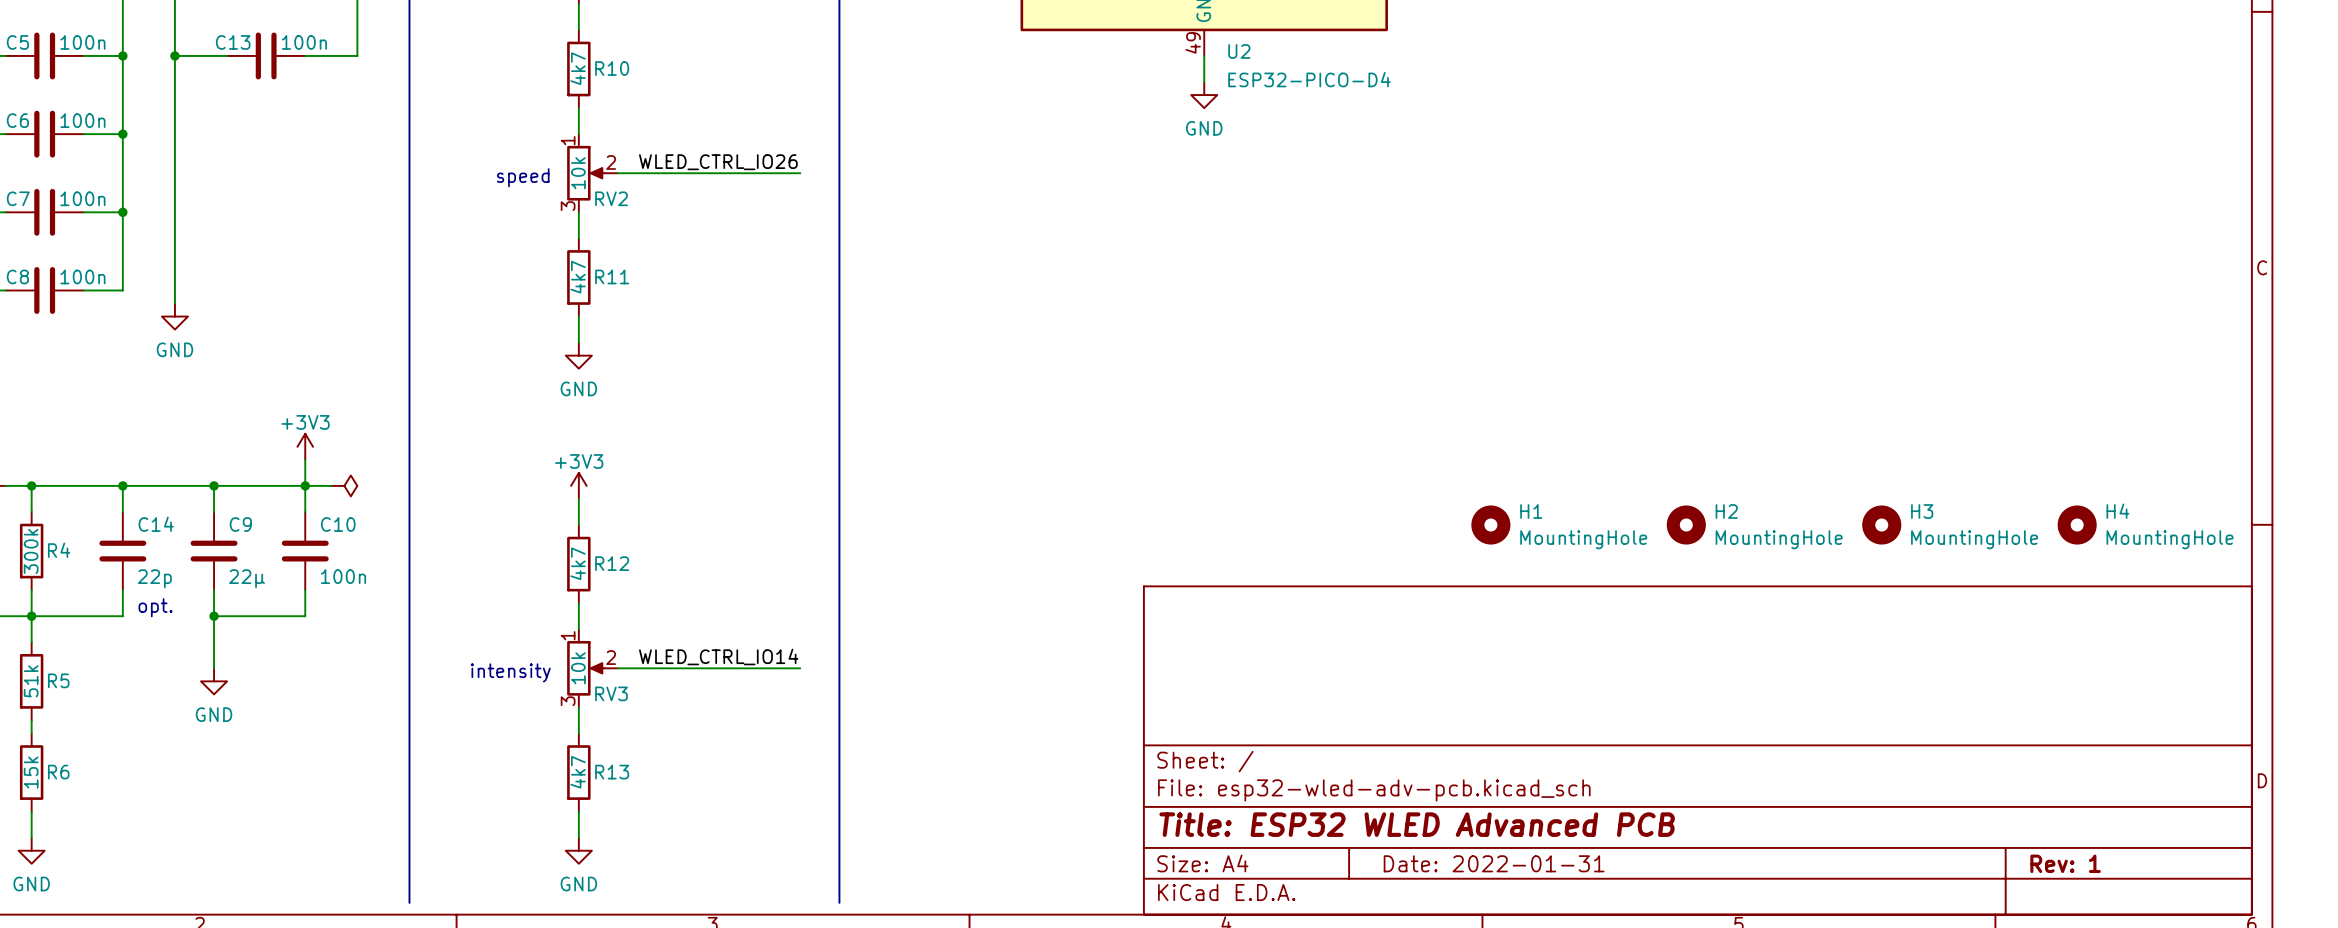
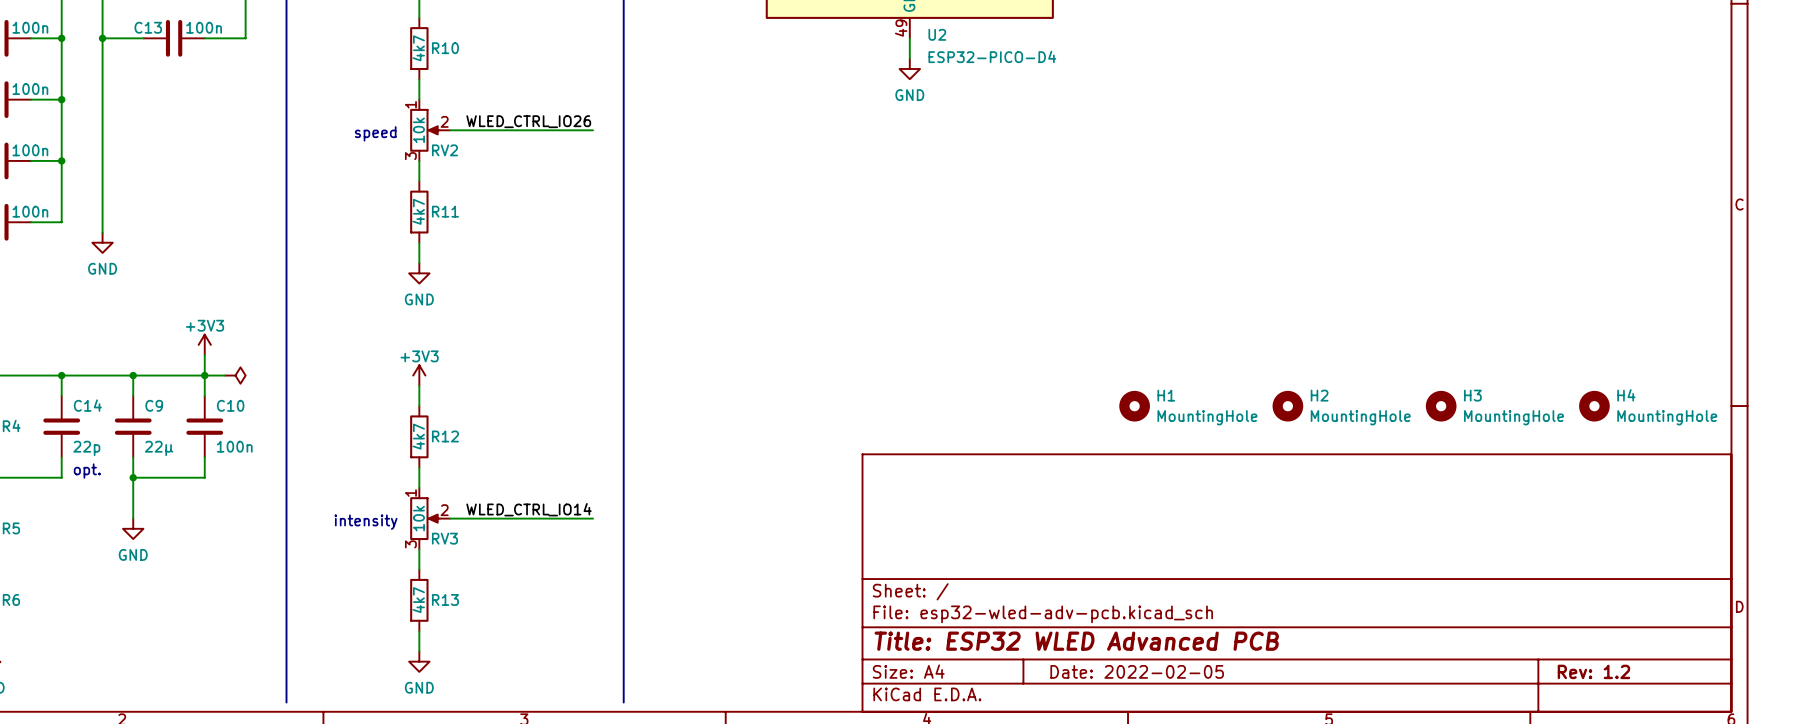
title block: Date: 2022-01-31 (1494, 863) -> Date: 2022-02-05 (1137, 671)
title block: Rev: 1 (2065, 863) -> Rev: 1.2 (1593, 671)

